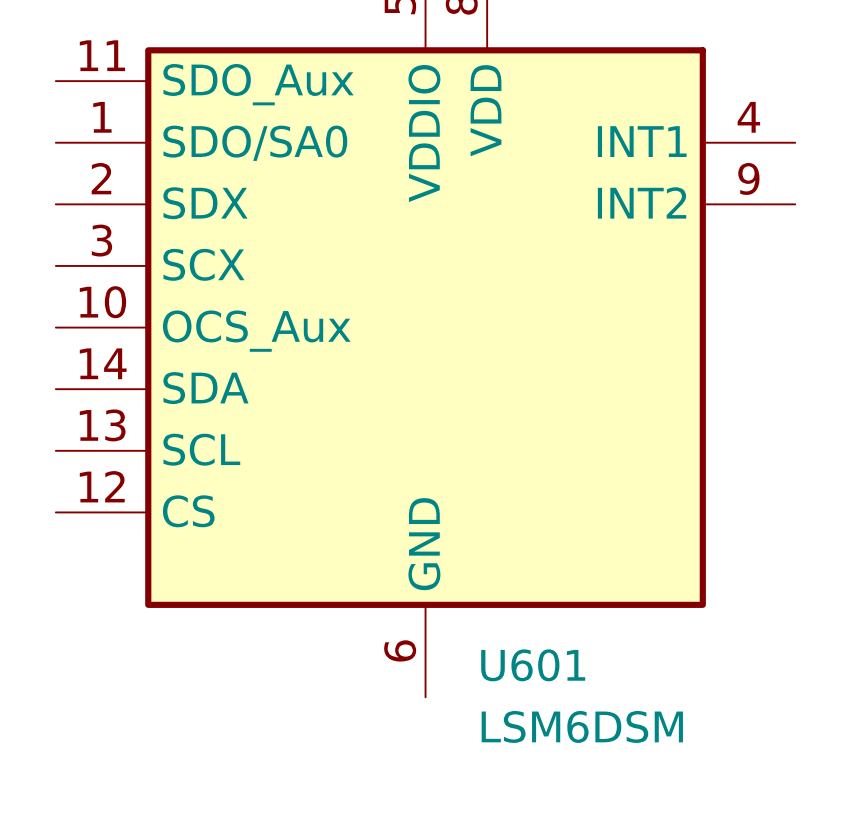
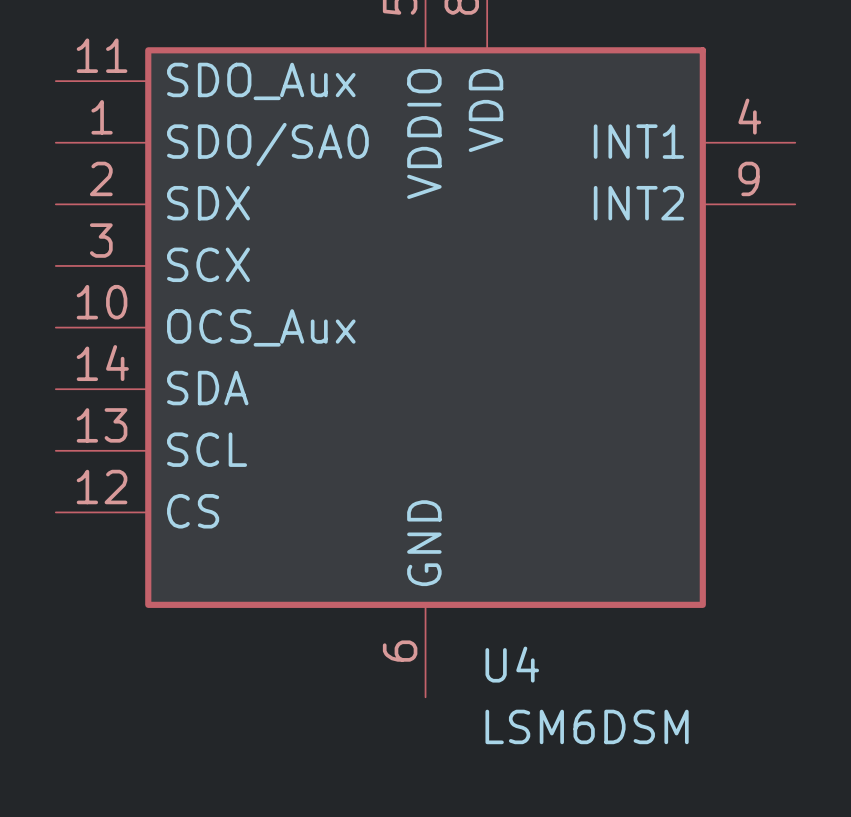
U601 name: U601 (533, 665) -> U4 (512, 664)

